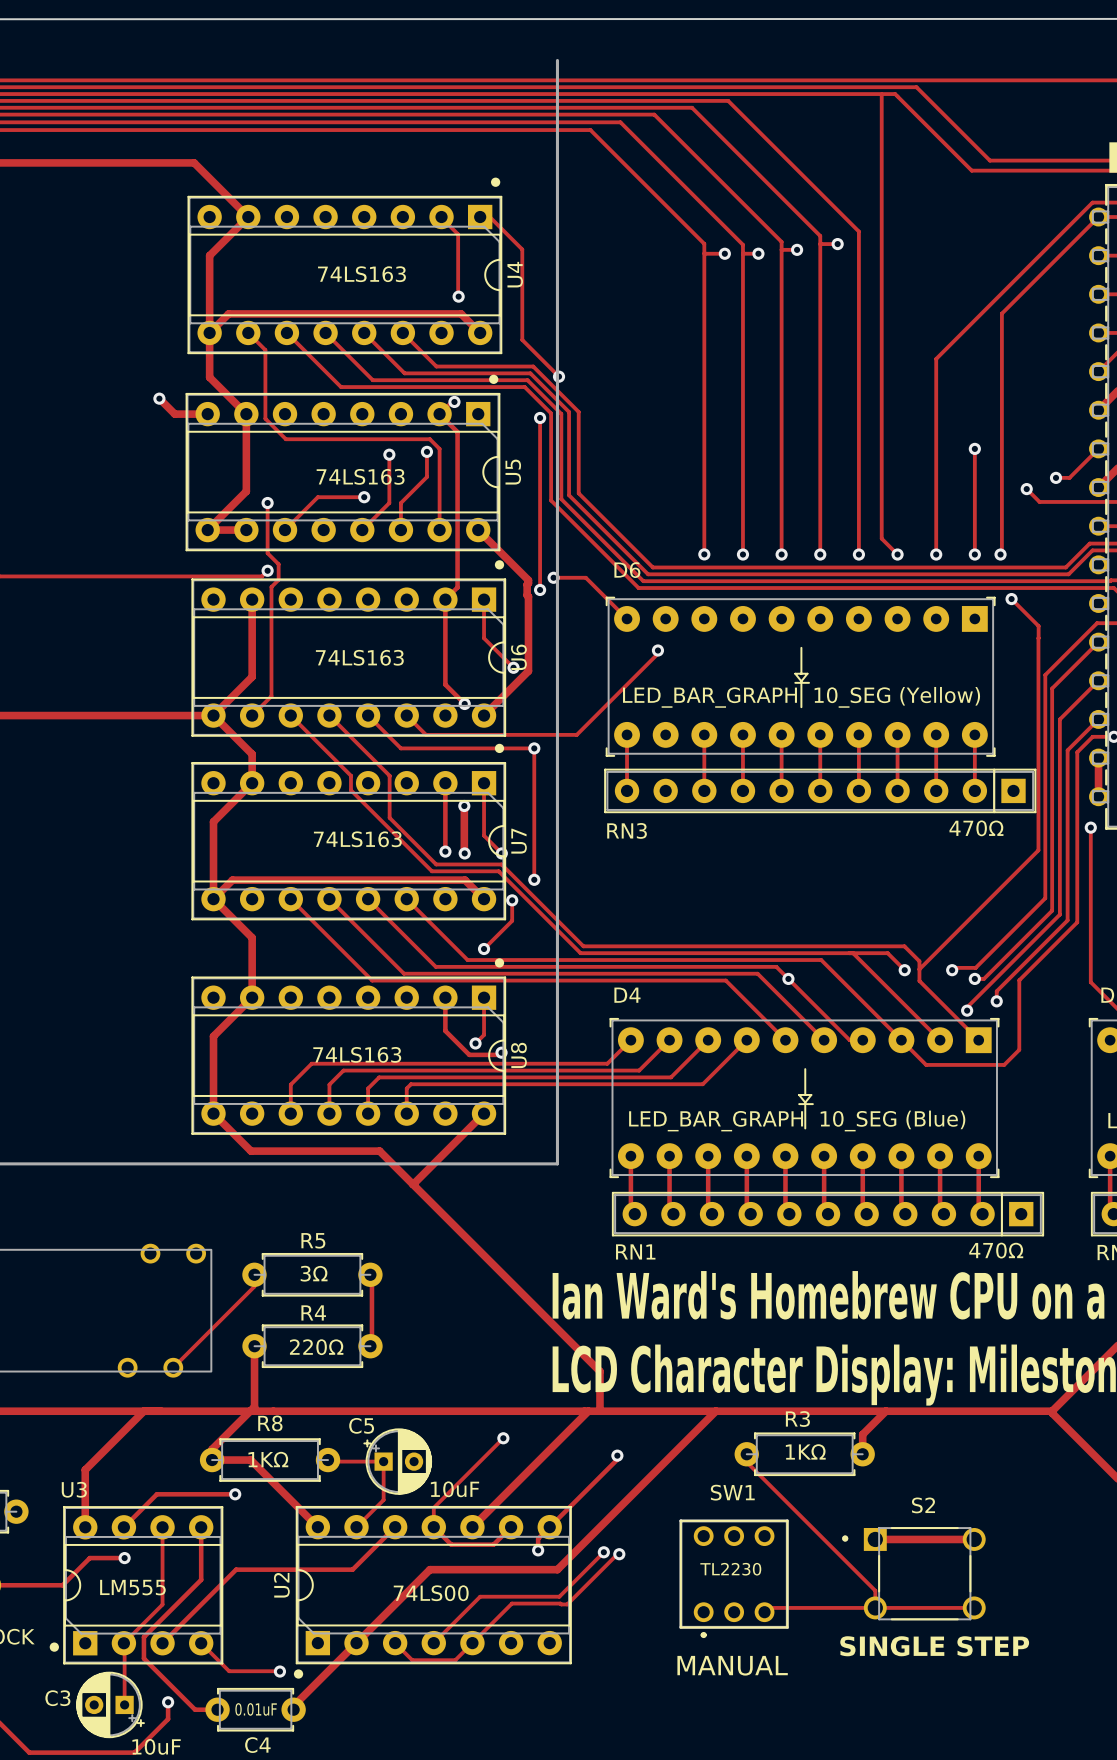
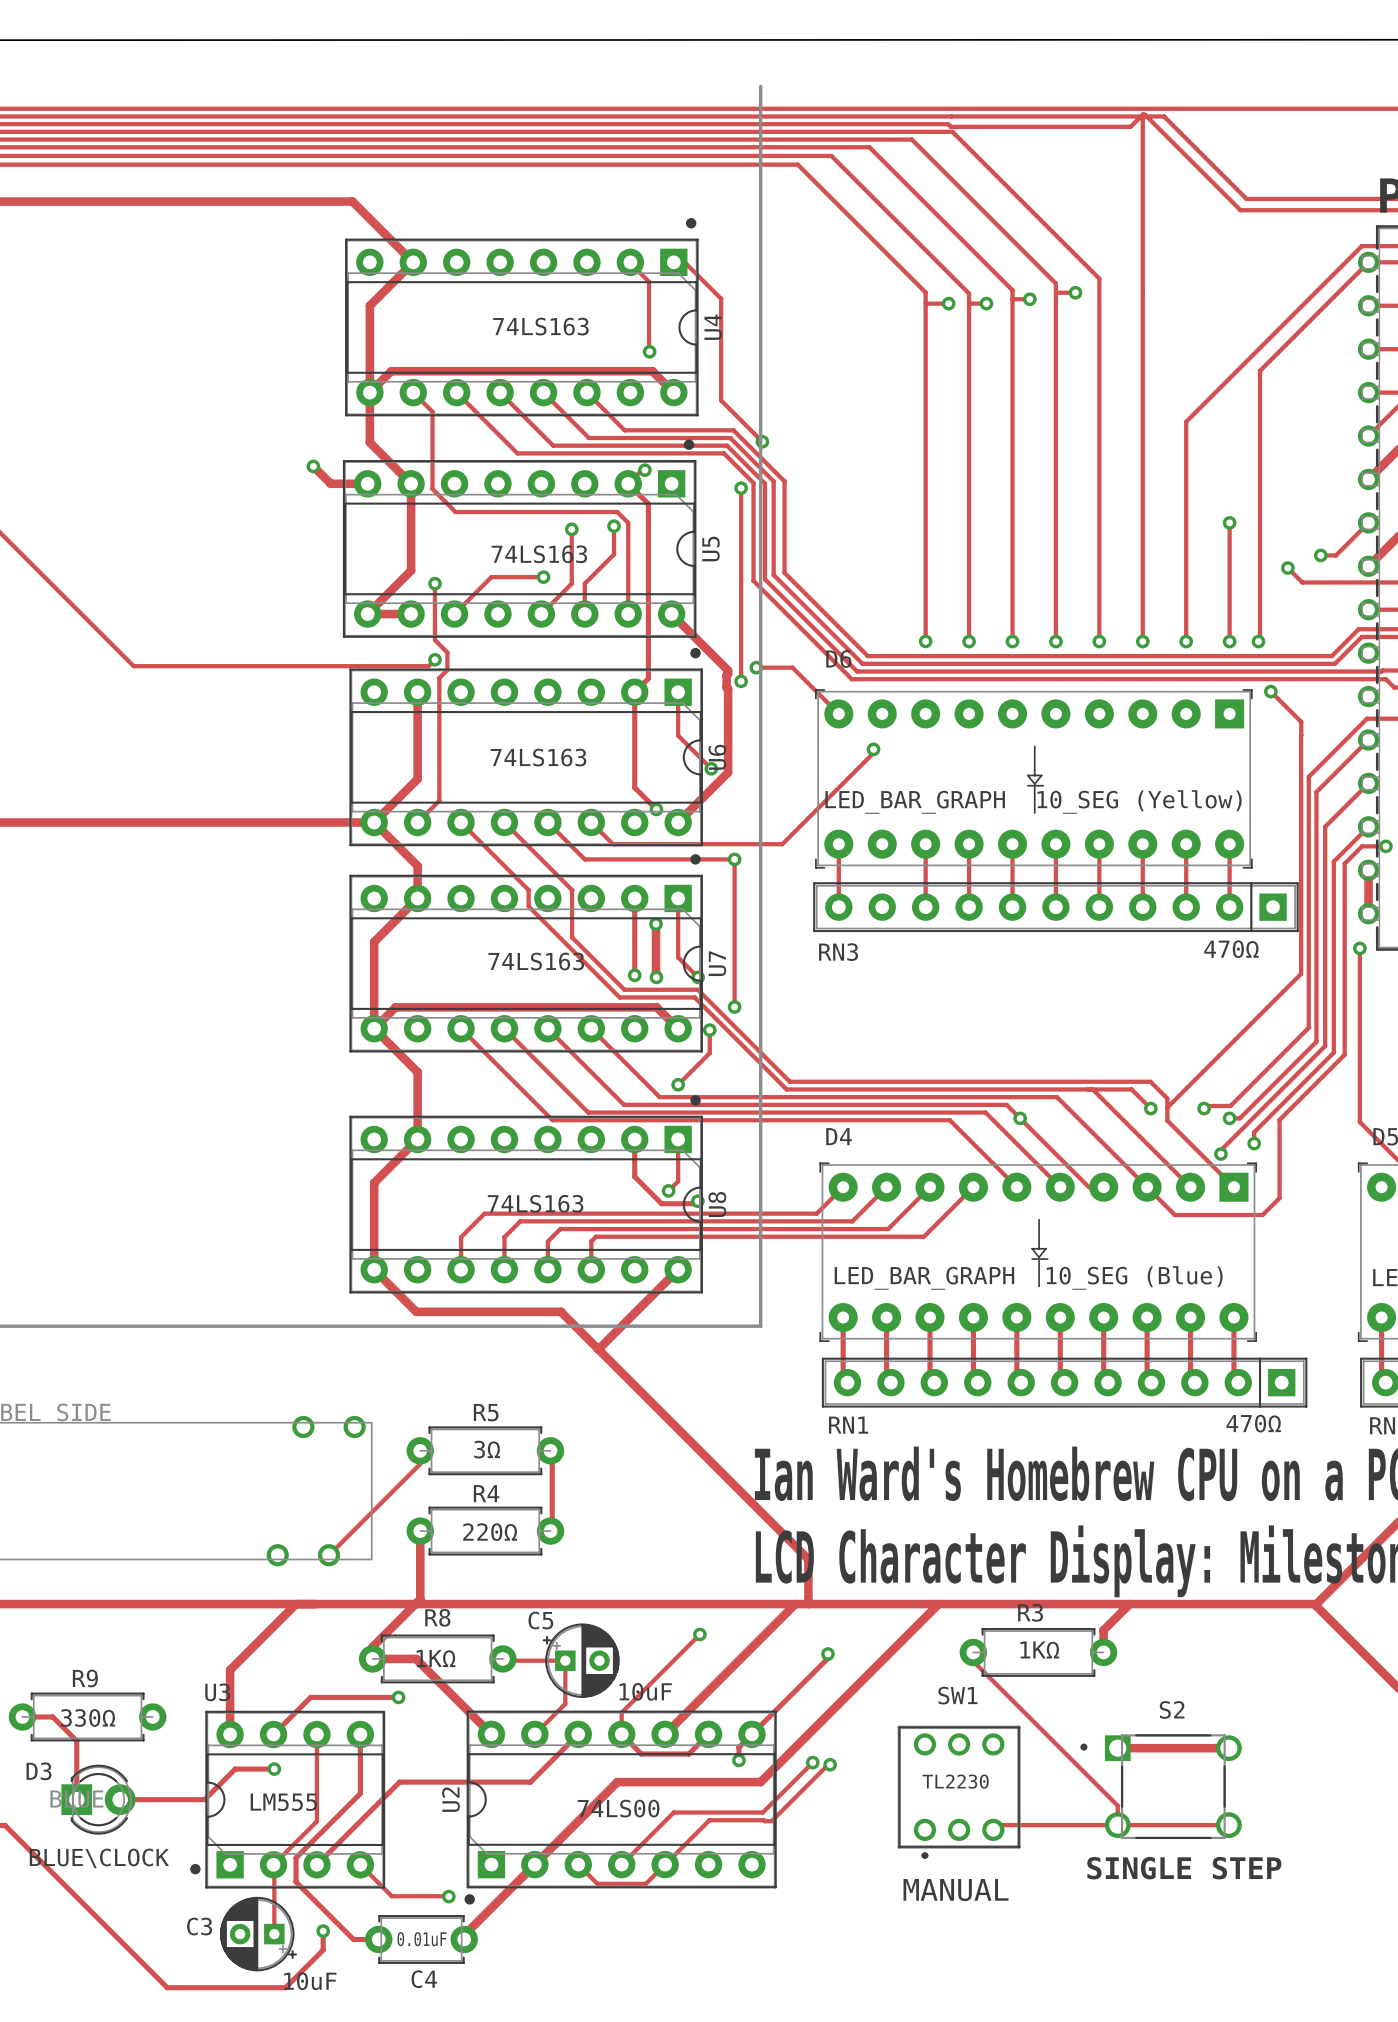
track: none -> (1142, 114) (1144, 114) (1240, 210)
track: (724, 94) (895, 94) (971, 170) (984, 170) -> (948, 124) (950, 126) (1130, 126) (1142, 114)
track: (881, 94) (881, 538) (897, 554) -> (1142, 114) (1142, 641)

